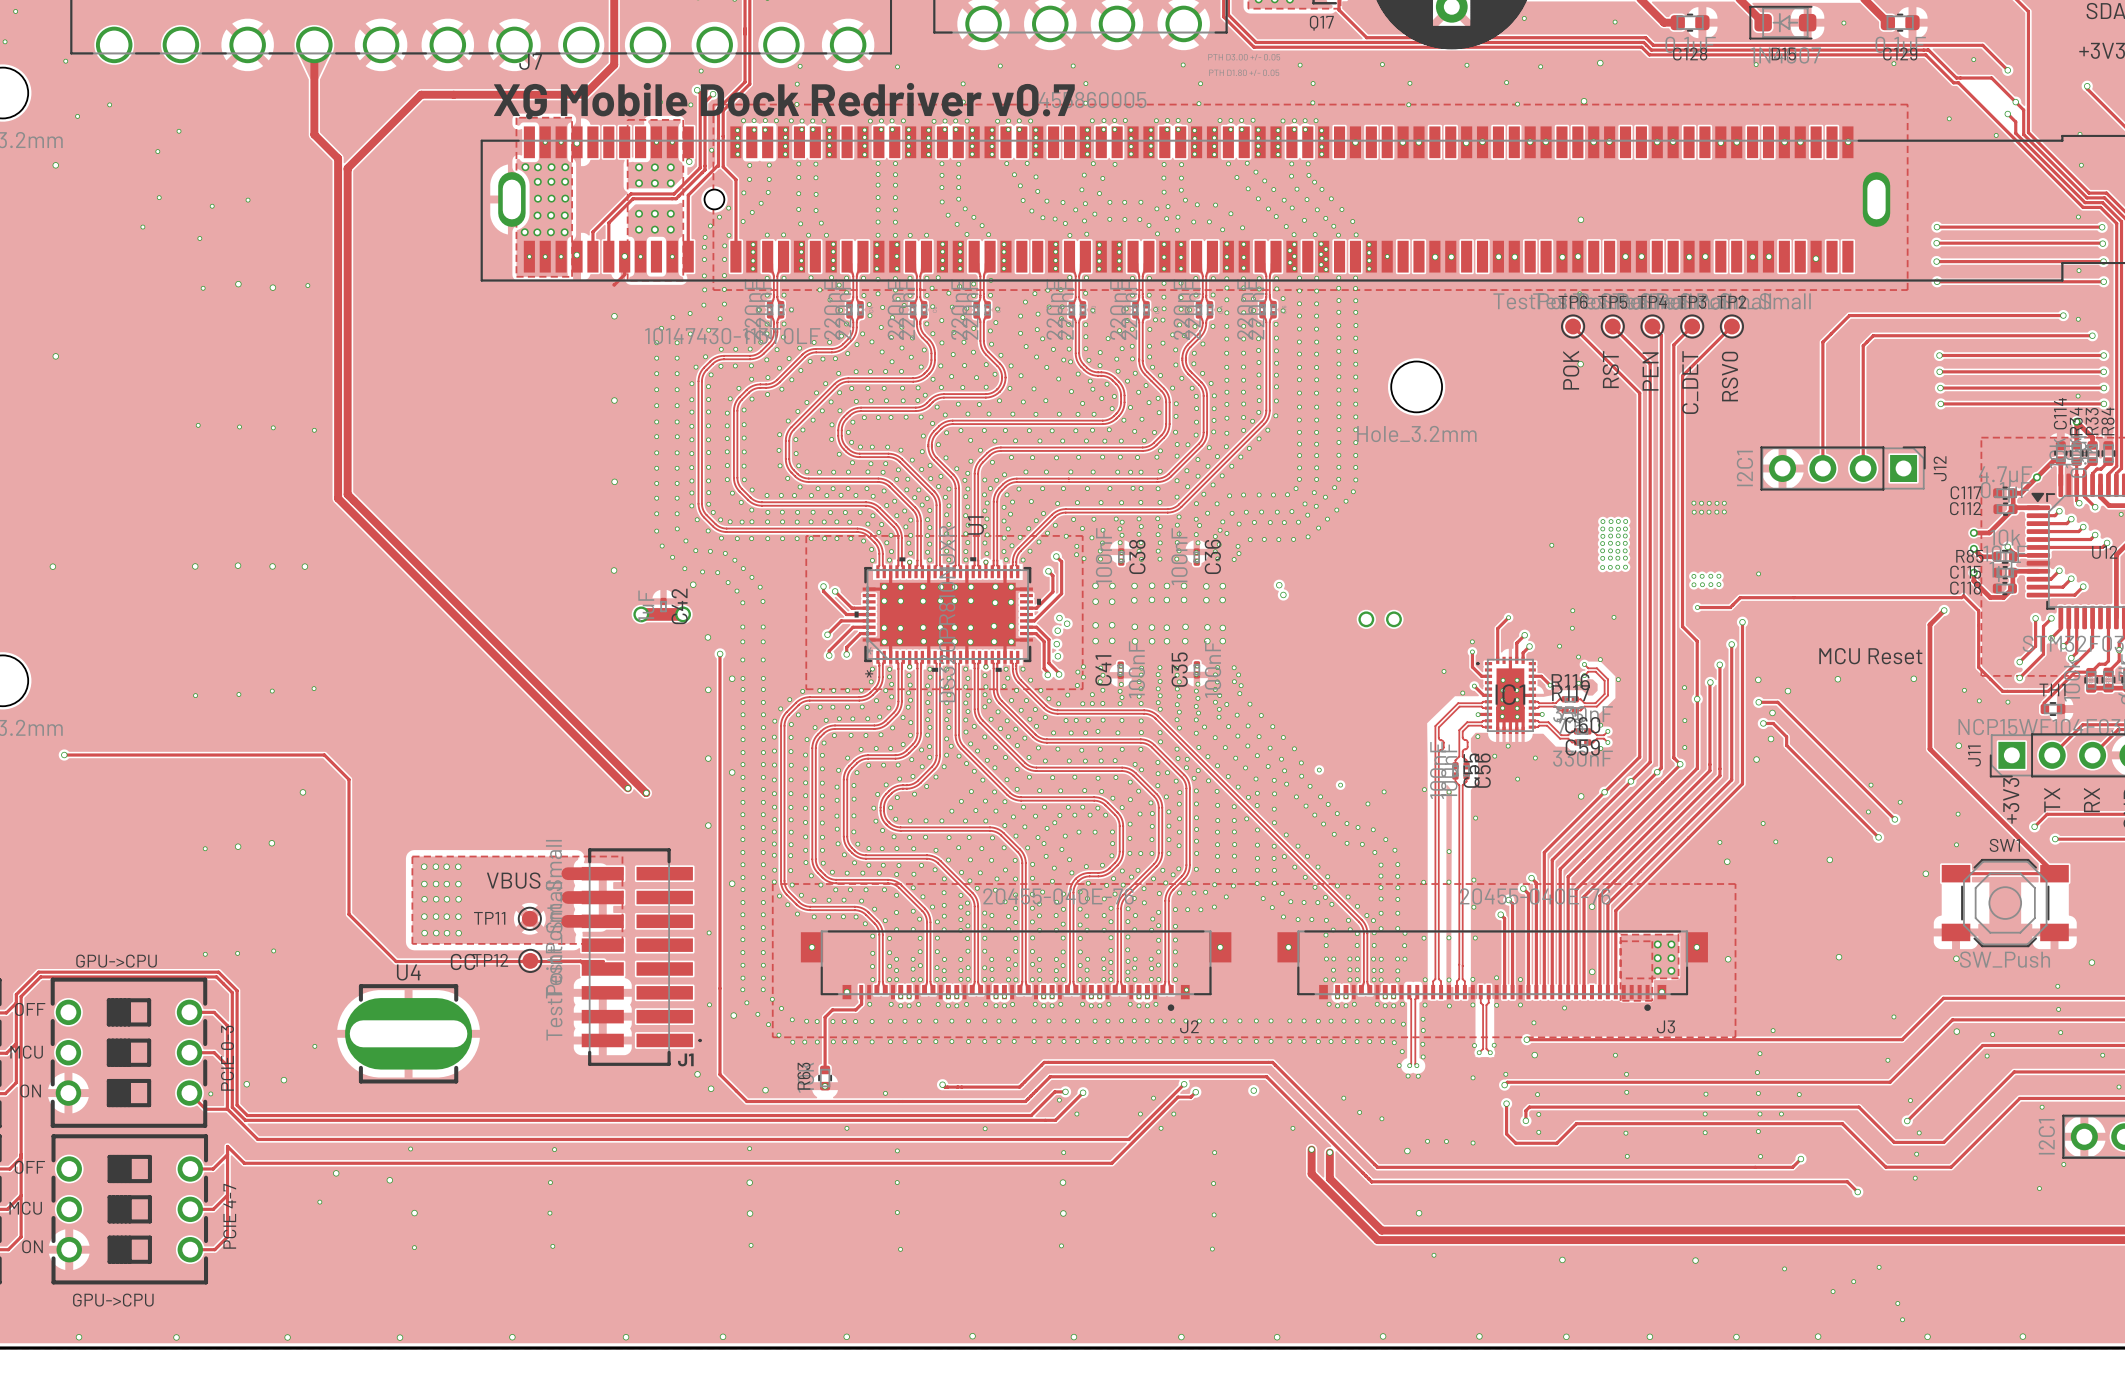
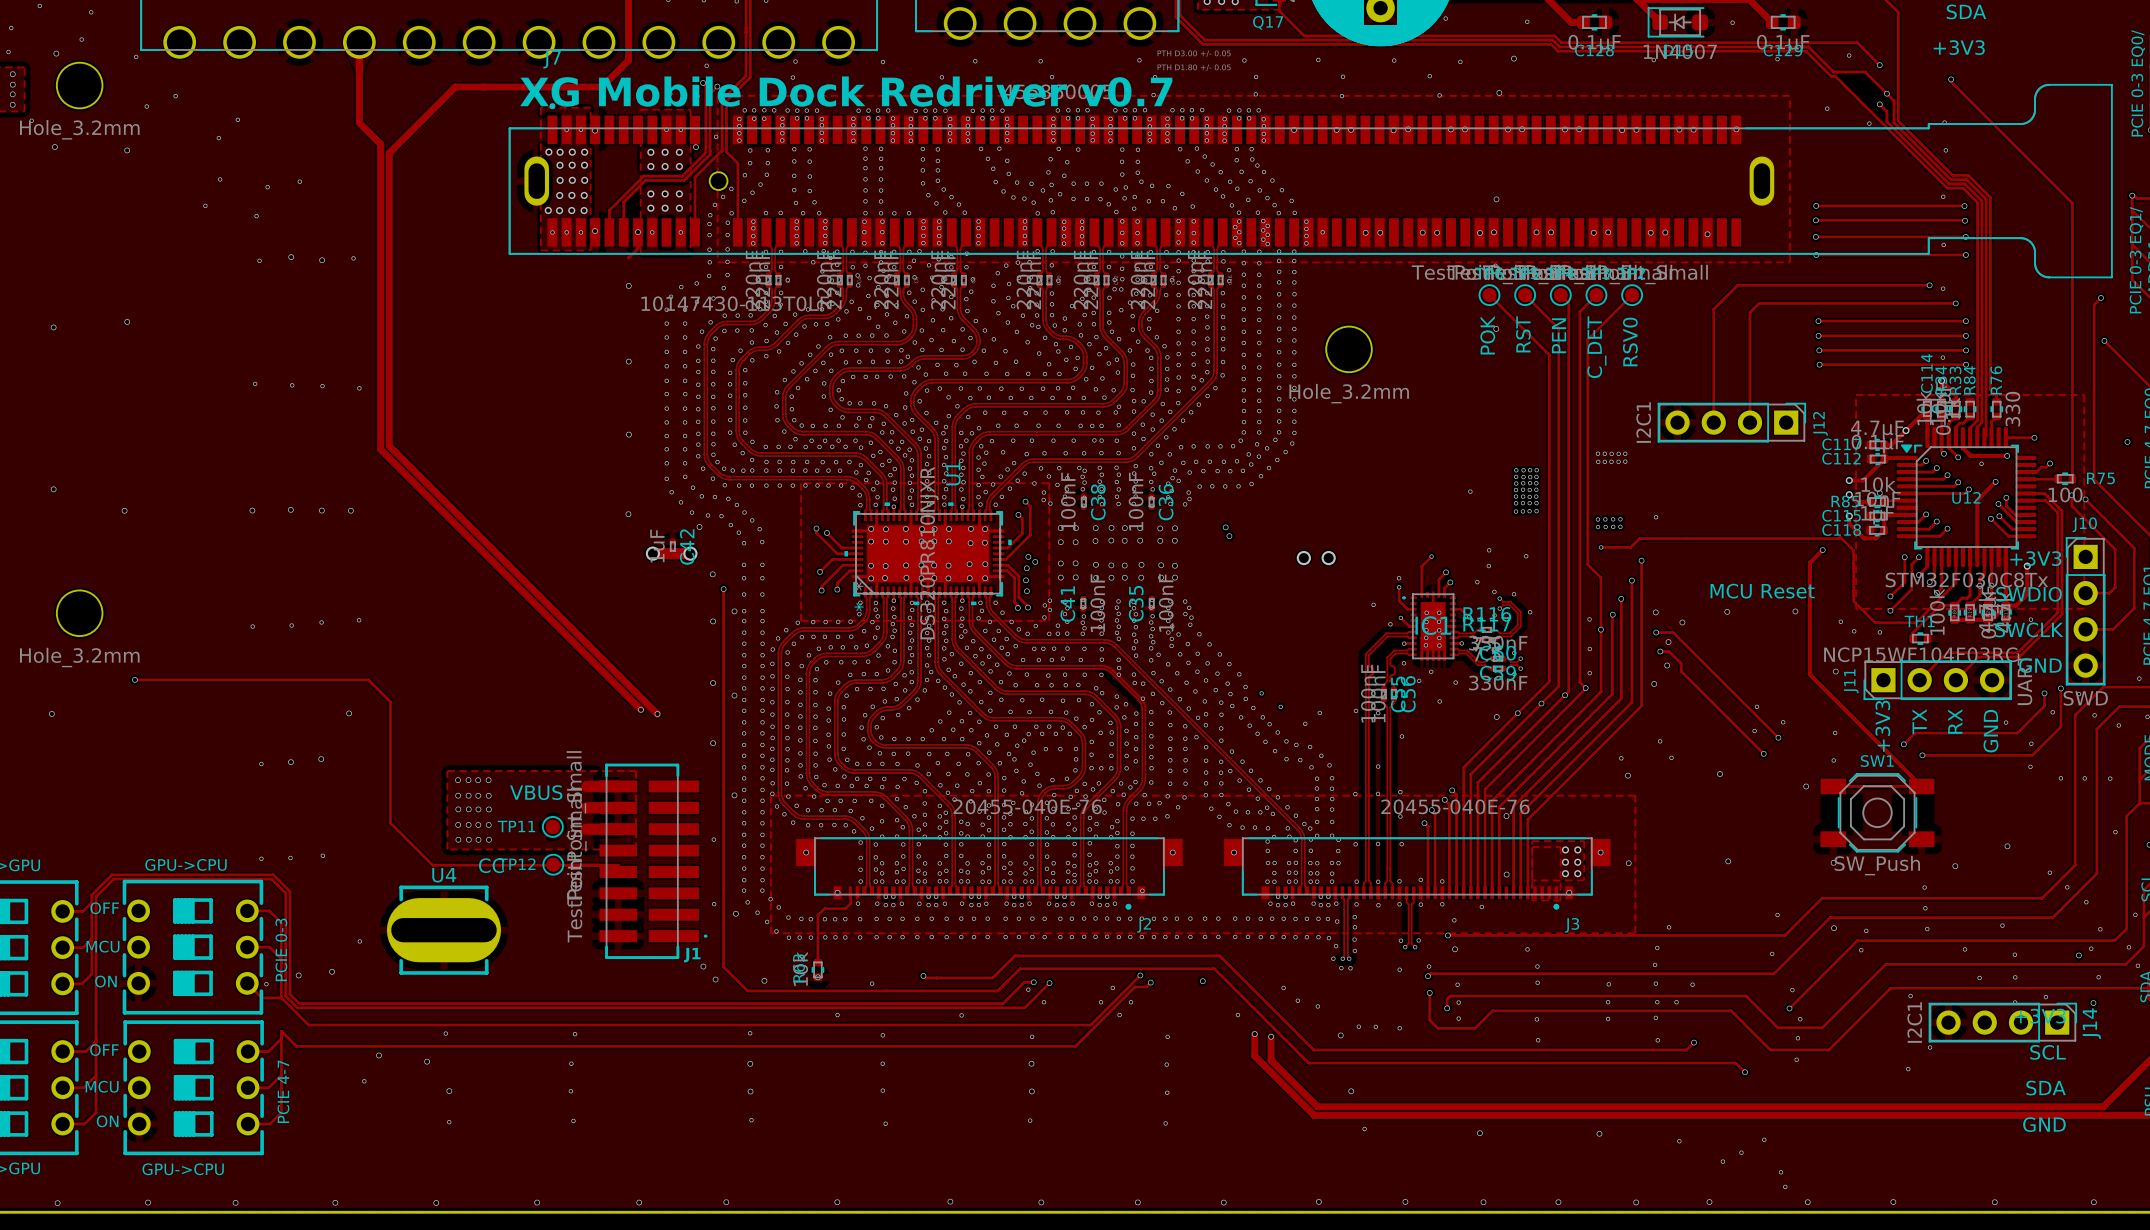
via: none -> (1118, 674)
via: (1157, 762) -> none
via: (1186, 767) -> none
via: (1167, 772) -> none
via: none -> (1142, 698)
via: (1194, 778) -> none
via: (1176, 781) -> none
via: none -> (1126, 704)

